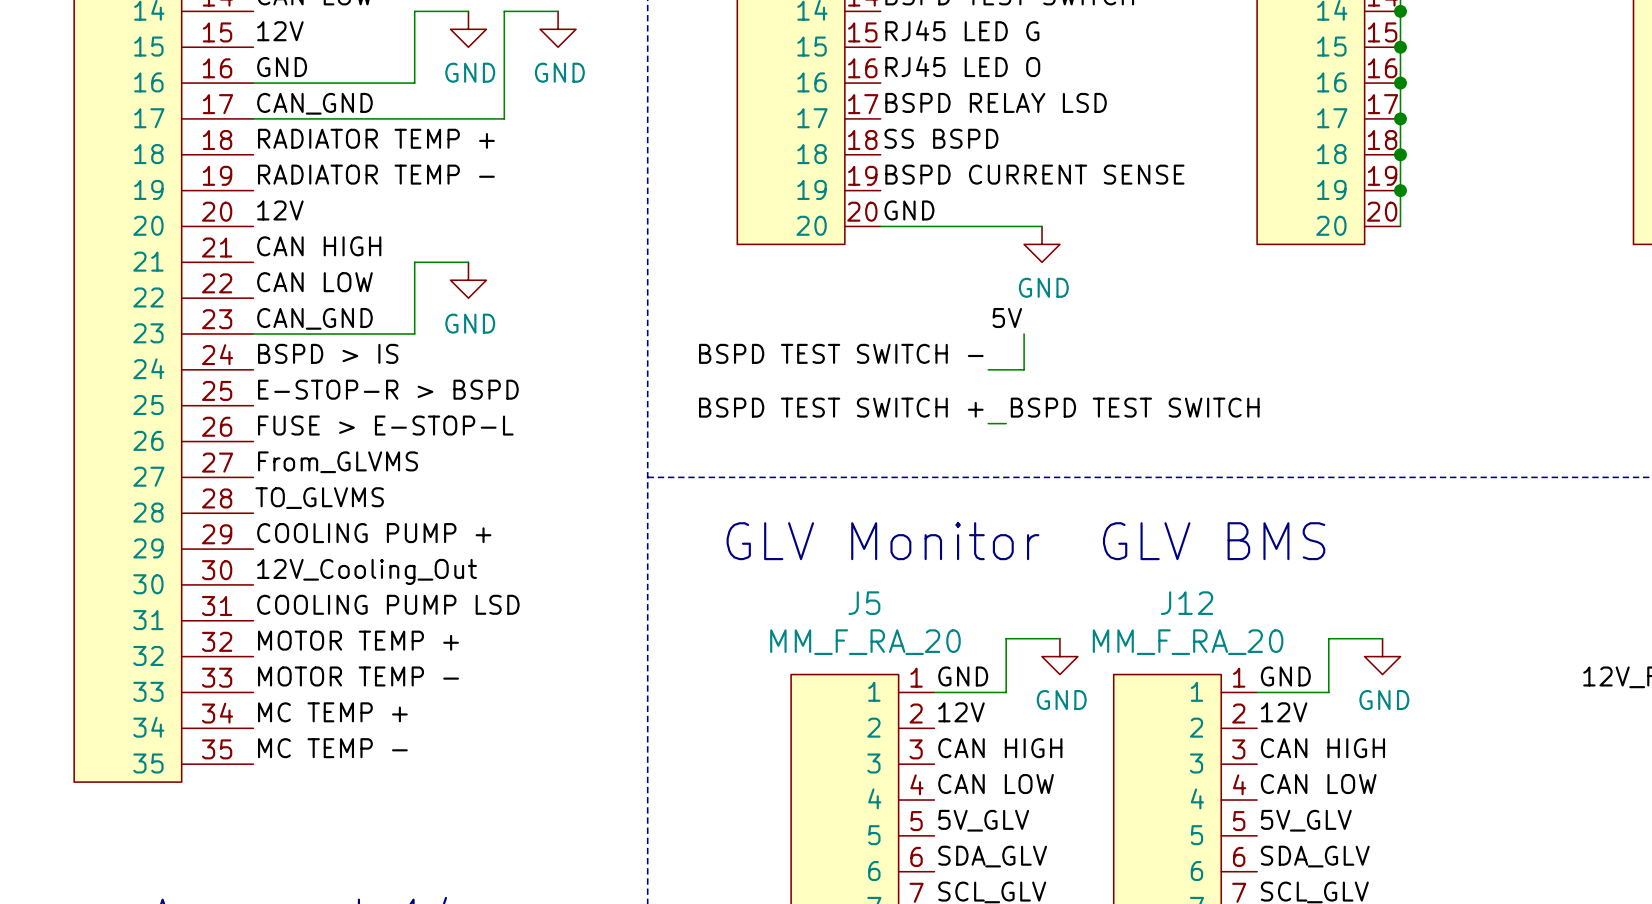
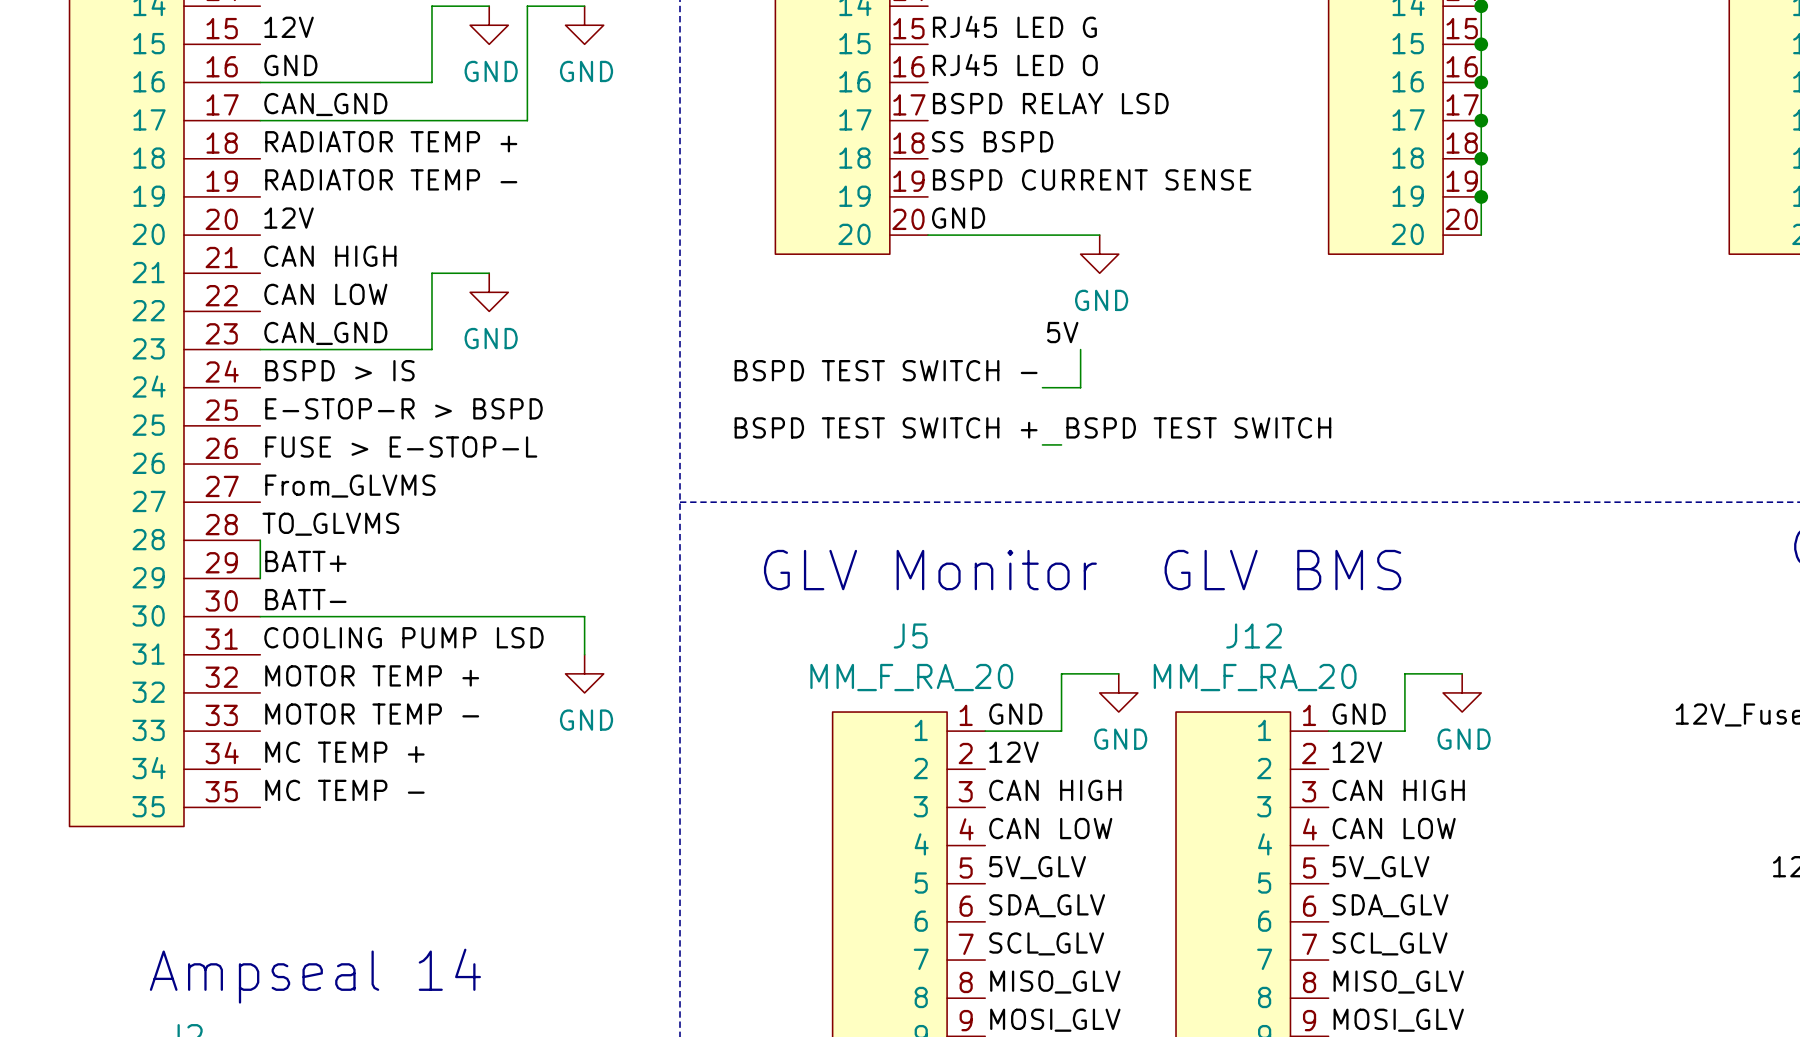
wire: none -> (260, 540) (260, 578)
label: COOLING PUMP + (374, 533) -> BATT+ (305, 561)
label: 12V_Cooling_Out (367, 571) -> BATT- (305, 599)
wire: none -> (260, 616) (584, 616) (584, 654)
power symbol: none -> GND (584, 673)

